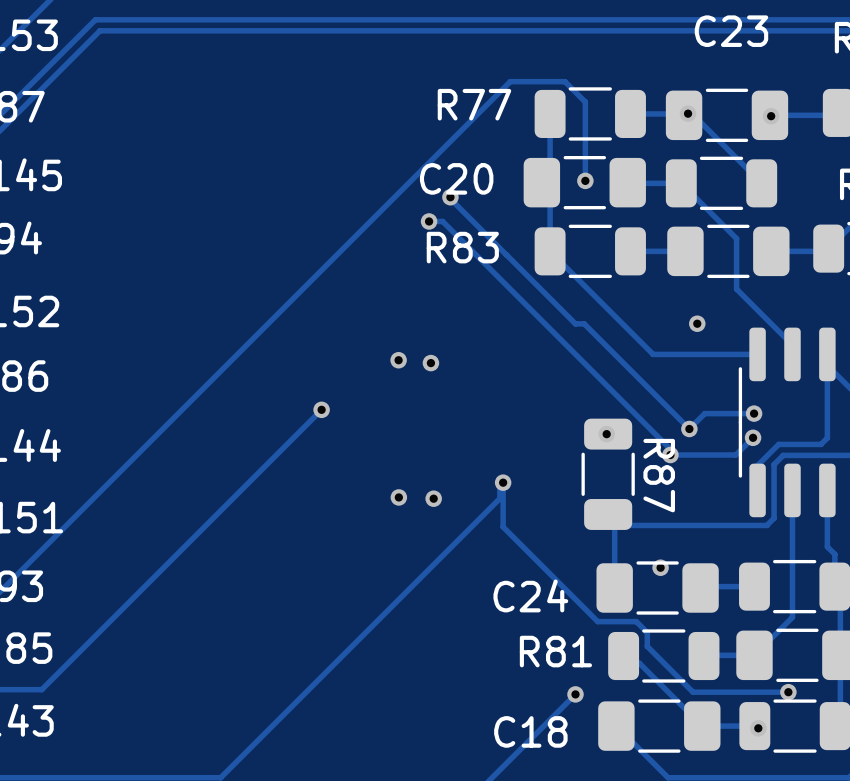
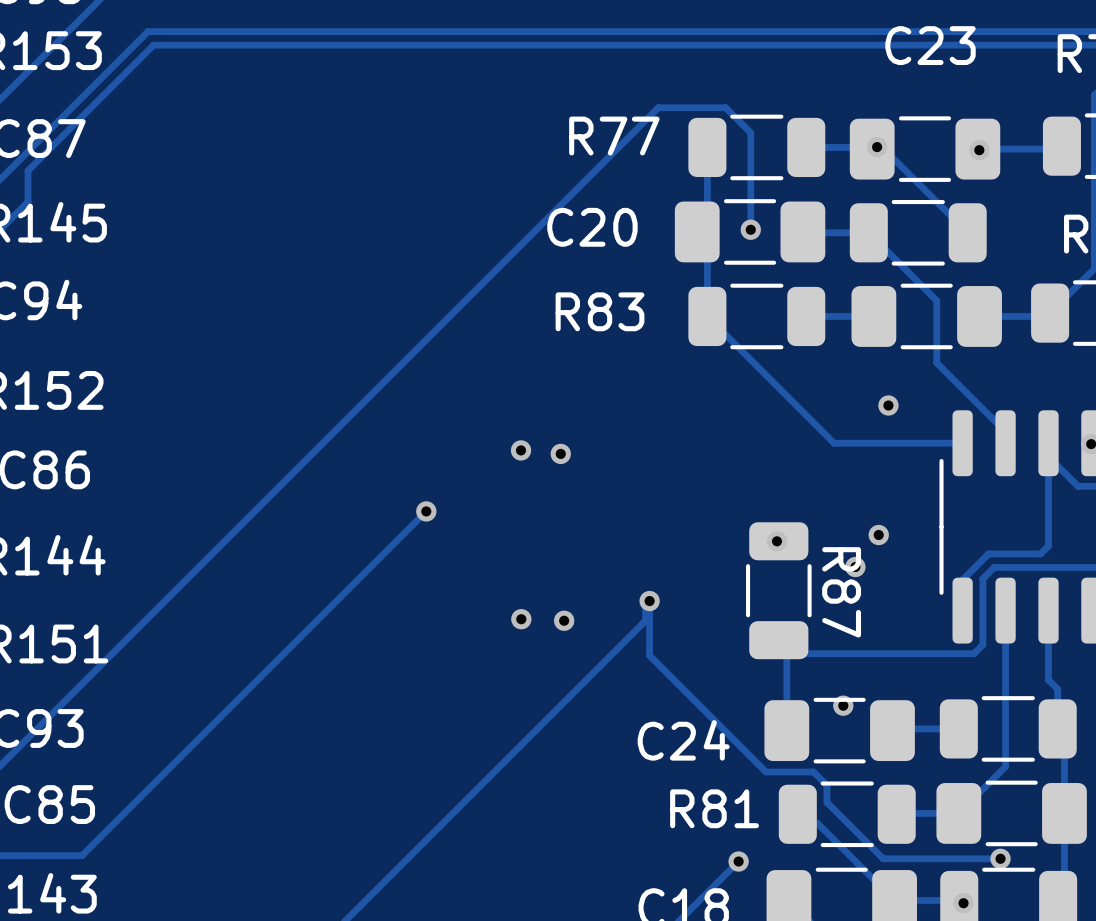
via: (450, 197) -> none
track: (452, 200) (450, 197) (575, 323) (584, 323) (689, 428) (704, 413) (754, 413) -> none
track: (429, 221) (442, 221) (670, 449) (670, 455) (735, 455) (753, 437) -> none
via: (429, 221) -> none
via: (754, 413) -> none
via: (753, 437) -> none

